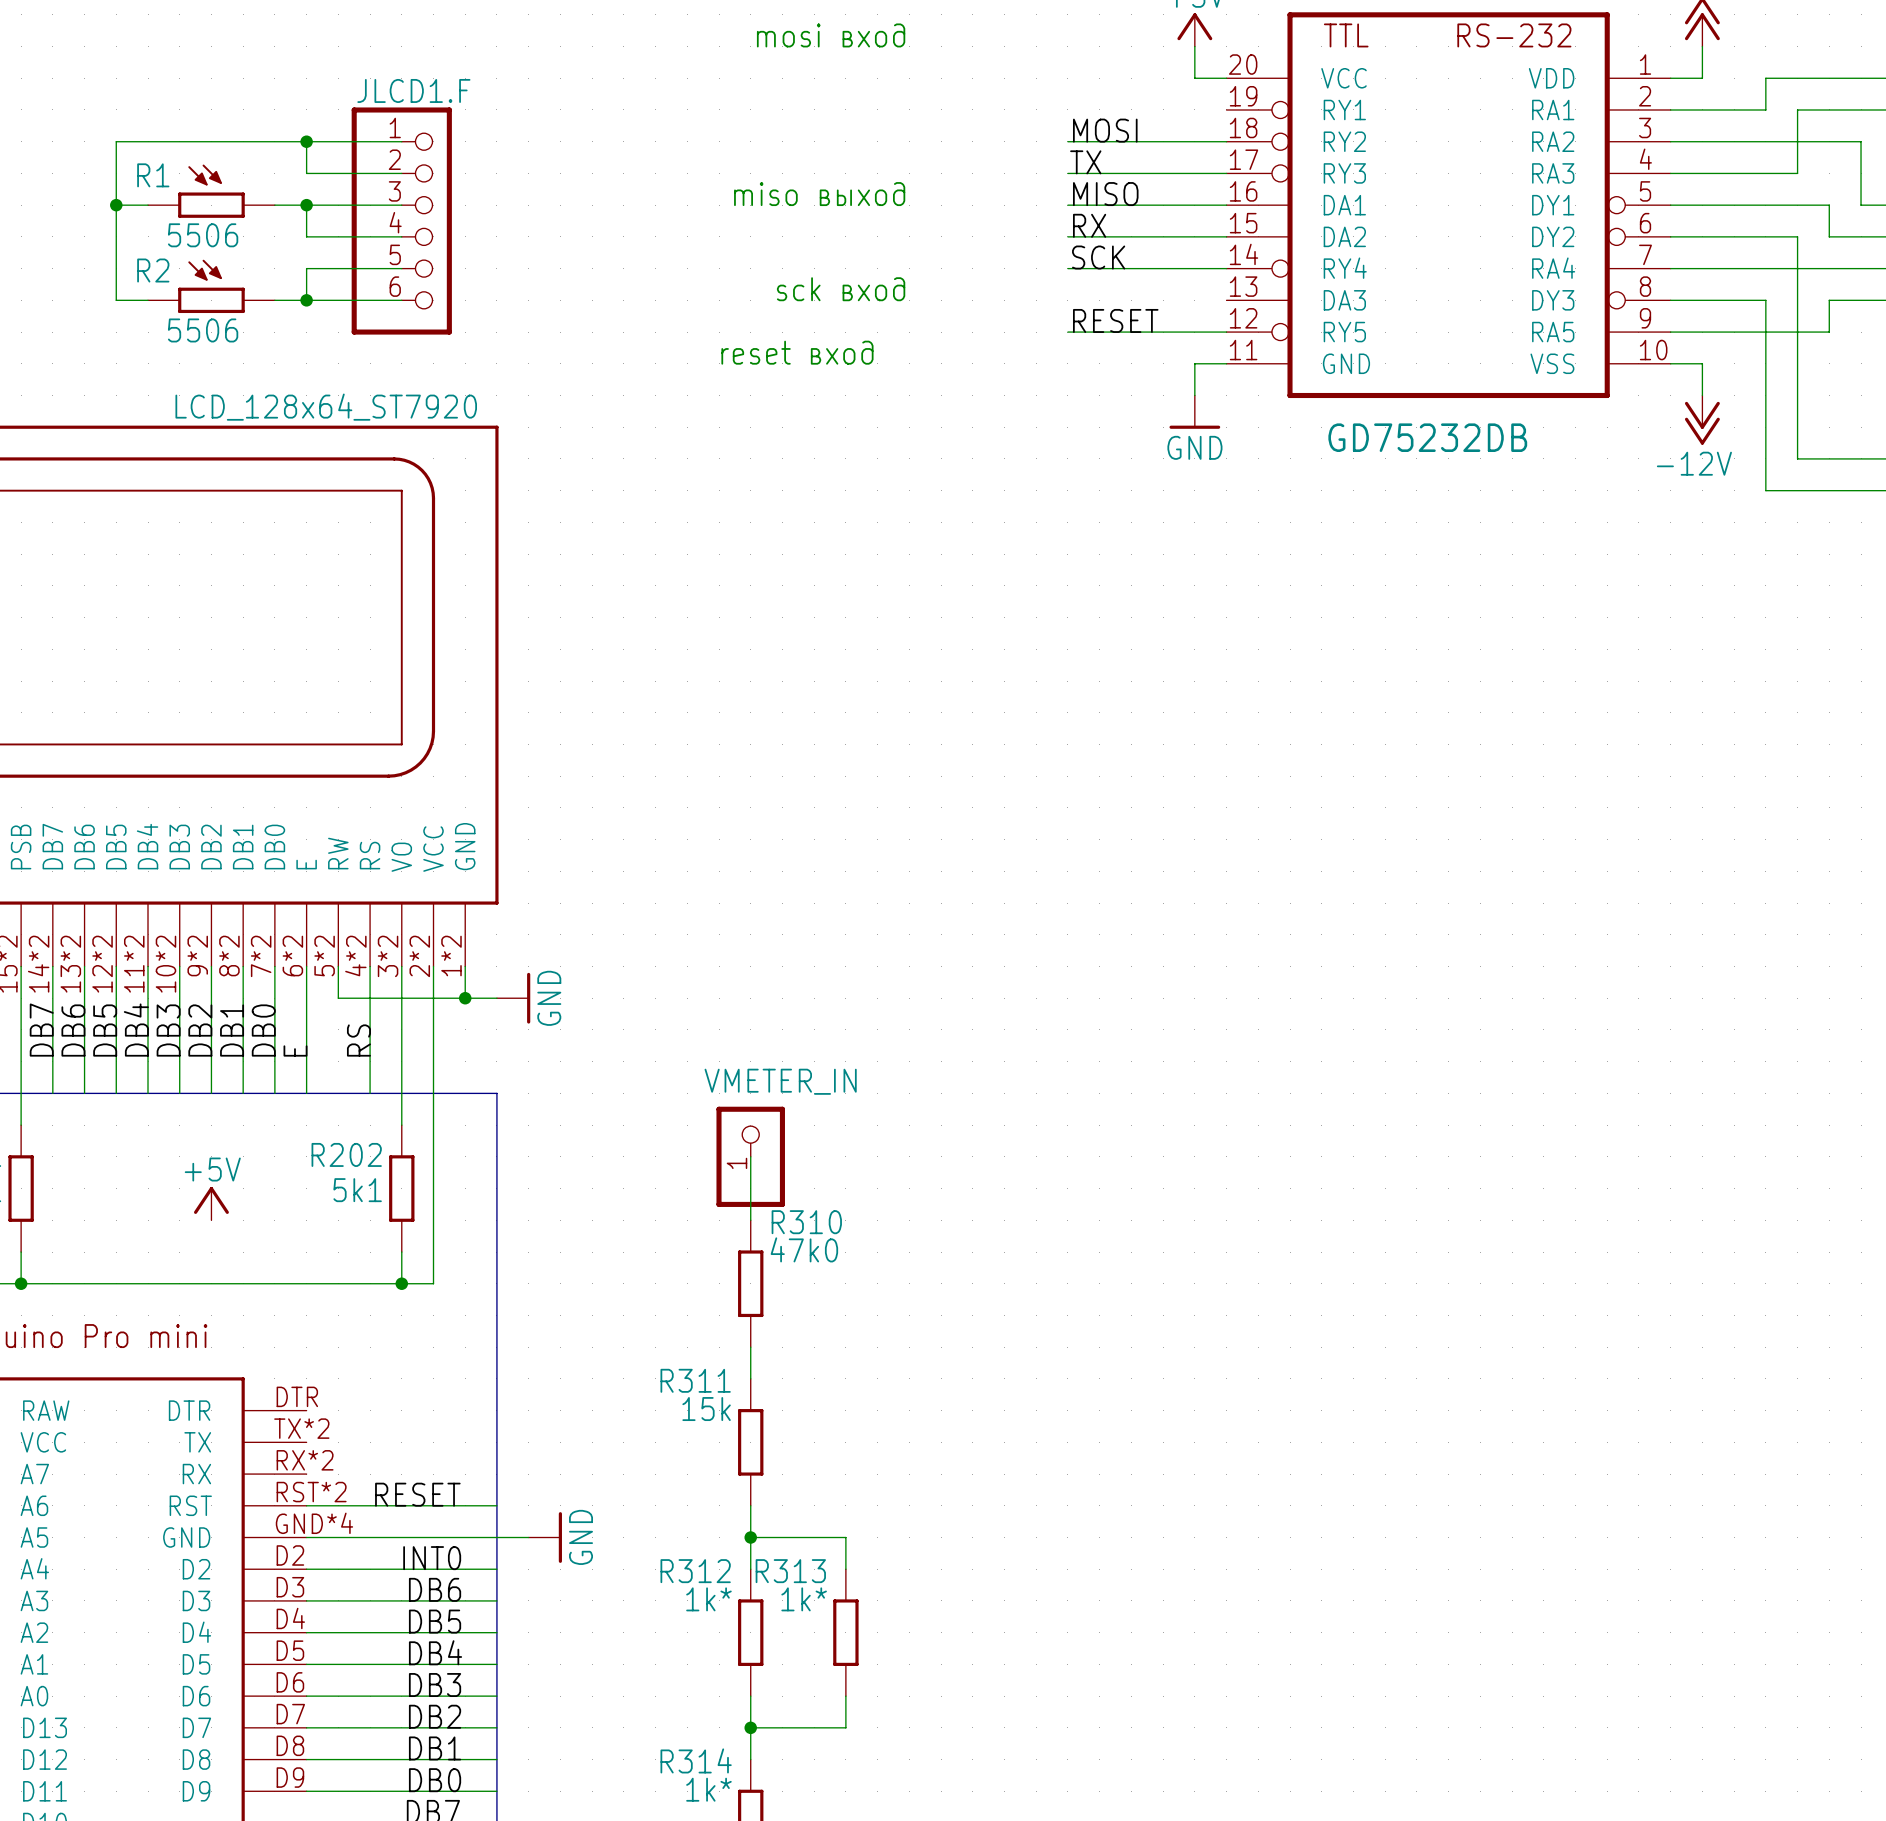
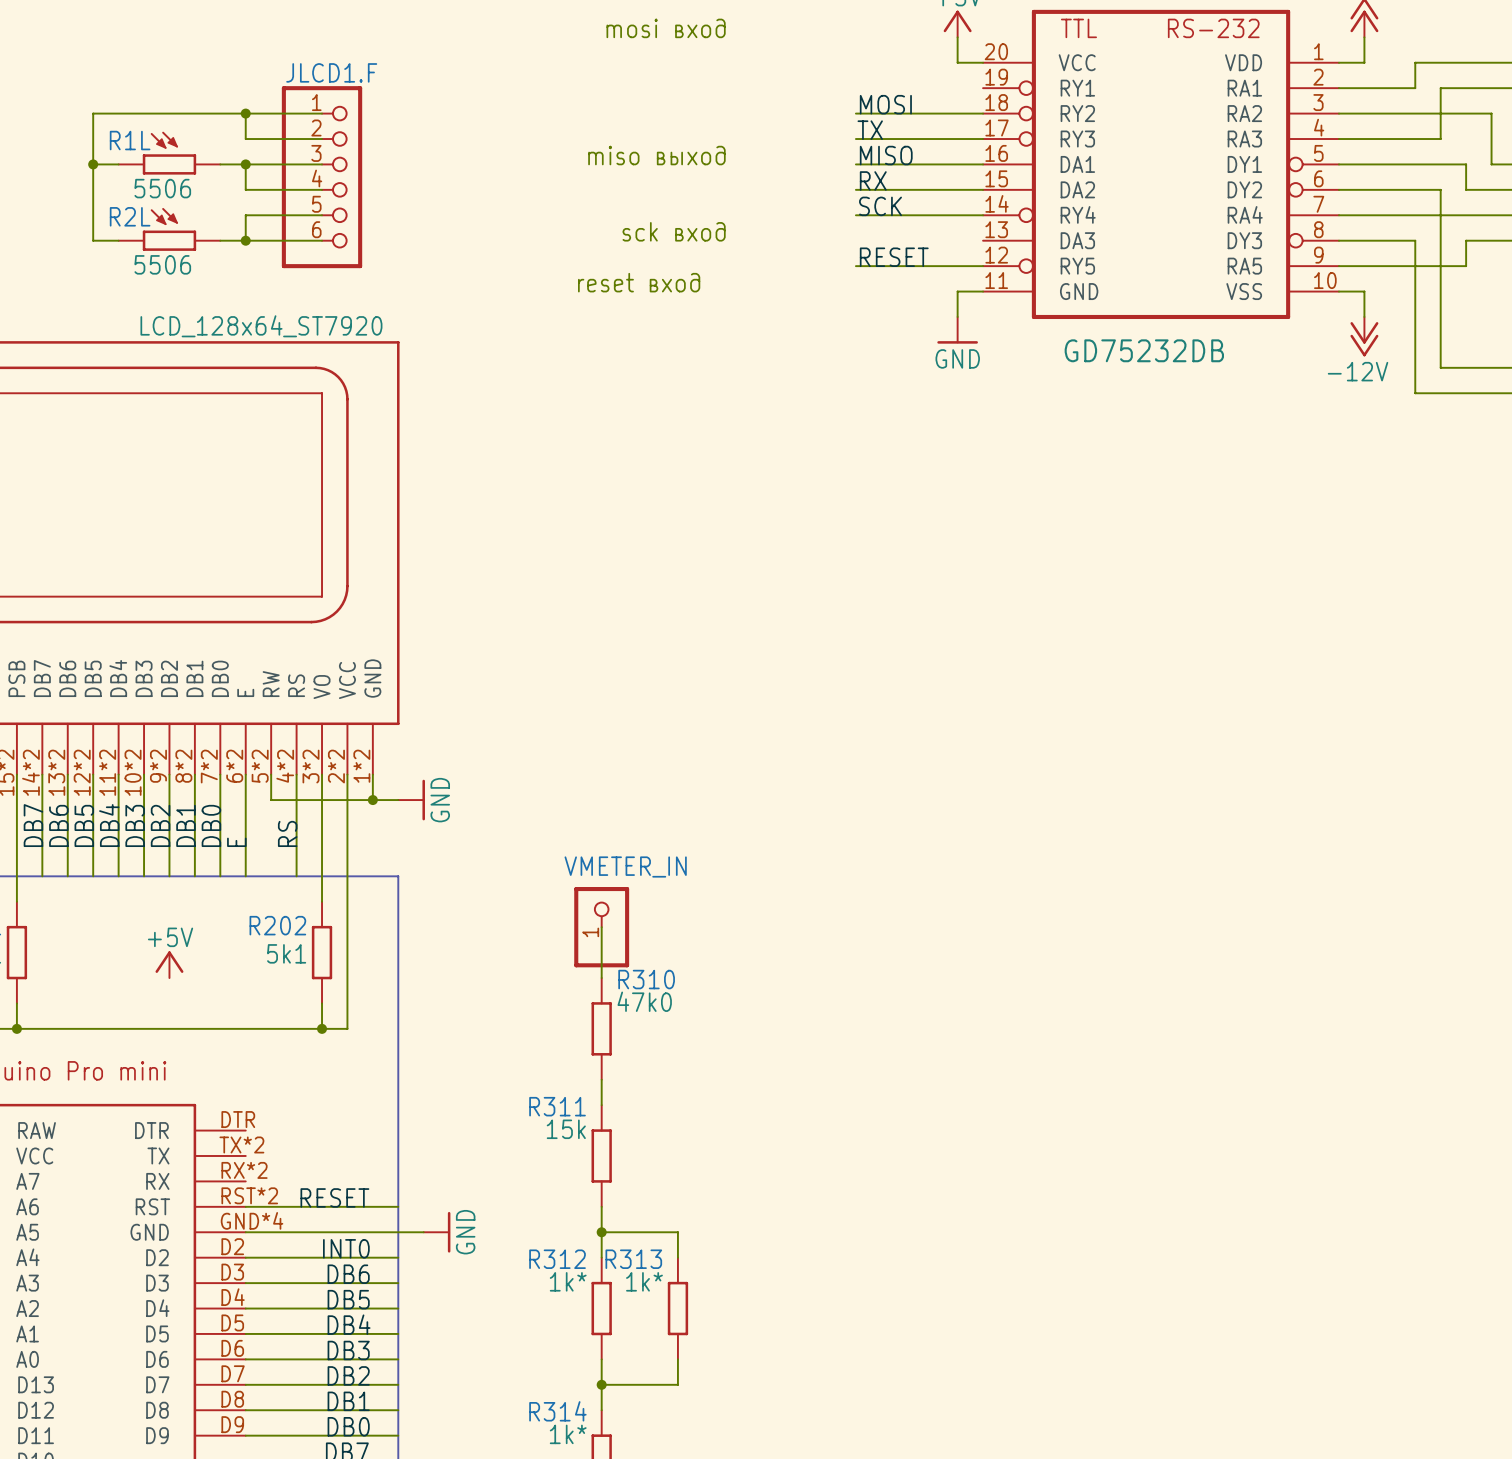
R1 name: R1 (153, 175) -> R1L (130, 140)
R2 name: R2 (153, 270) -> R2L (130, 216)

